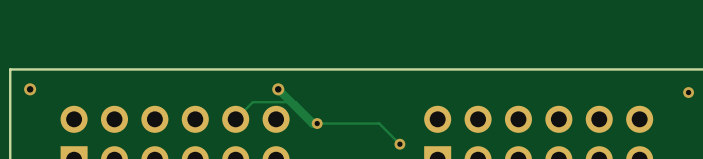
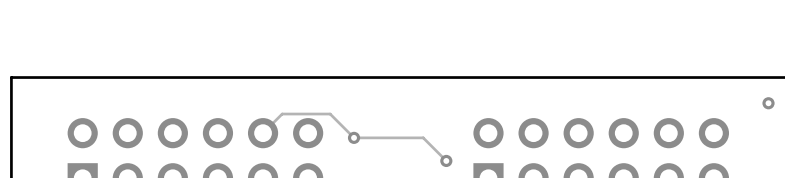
via: (30, 89) -> none
track: (278, 89) (312, 123) (317, 123) -> none
via: (278, 89) -> none

